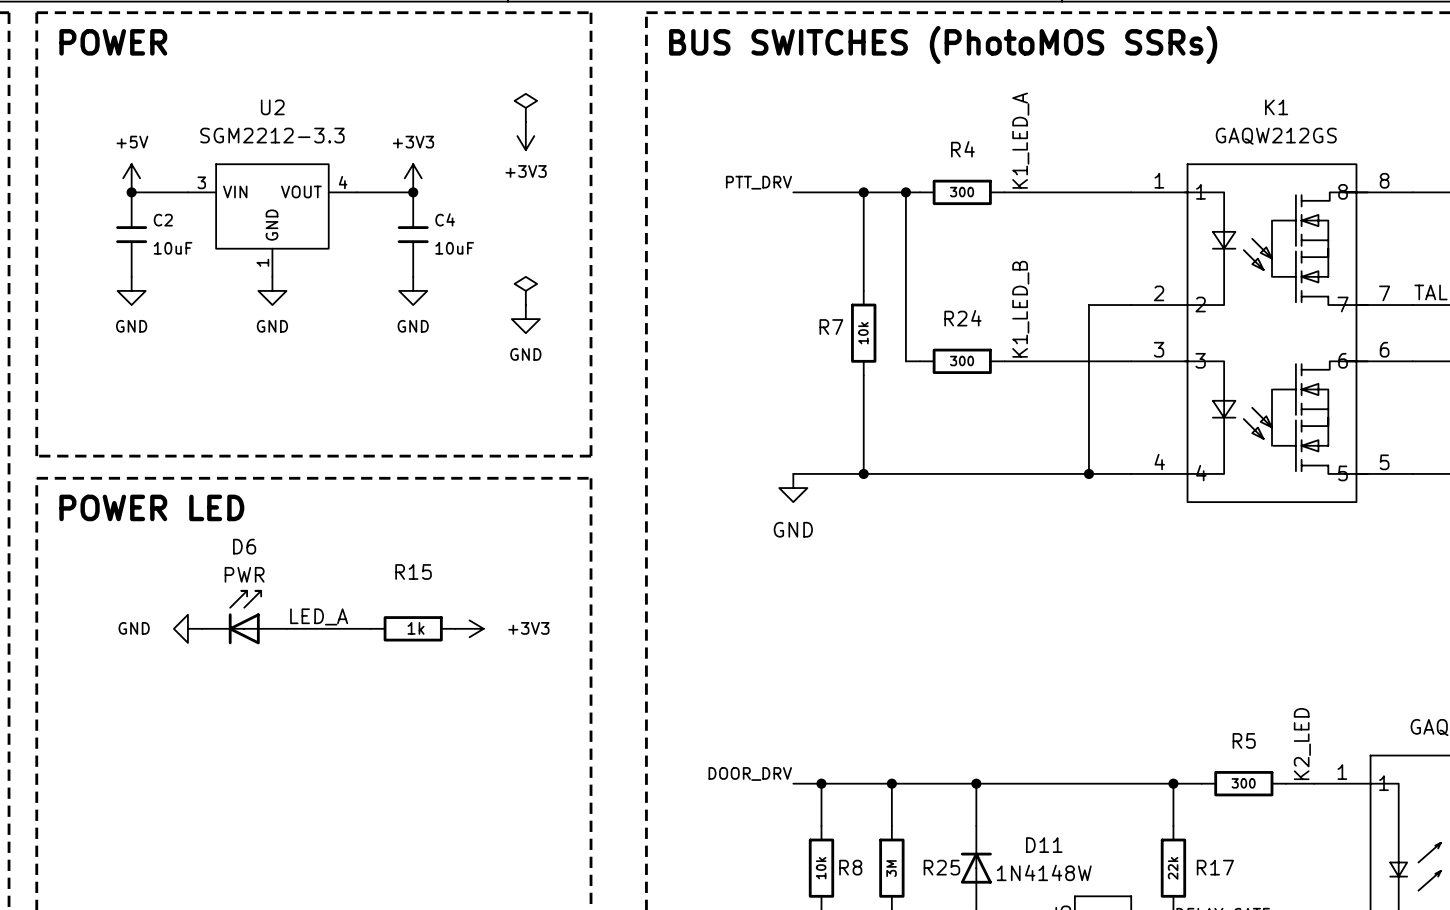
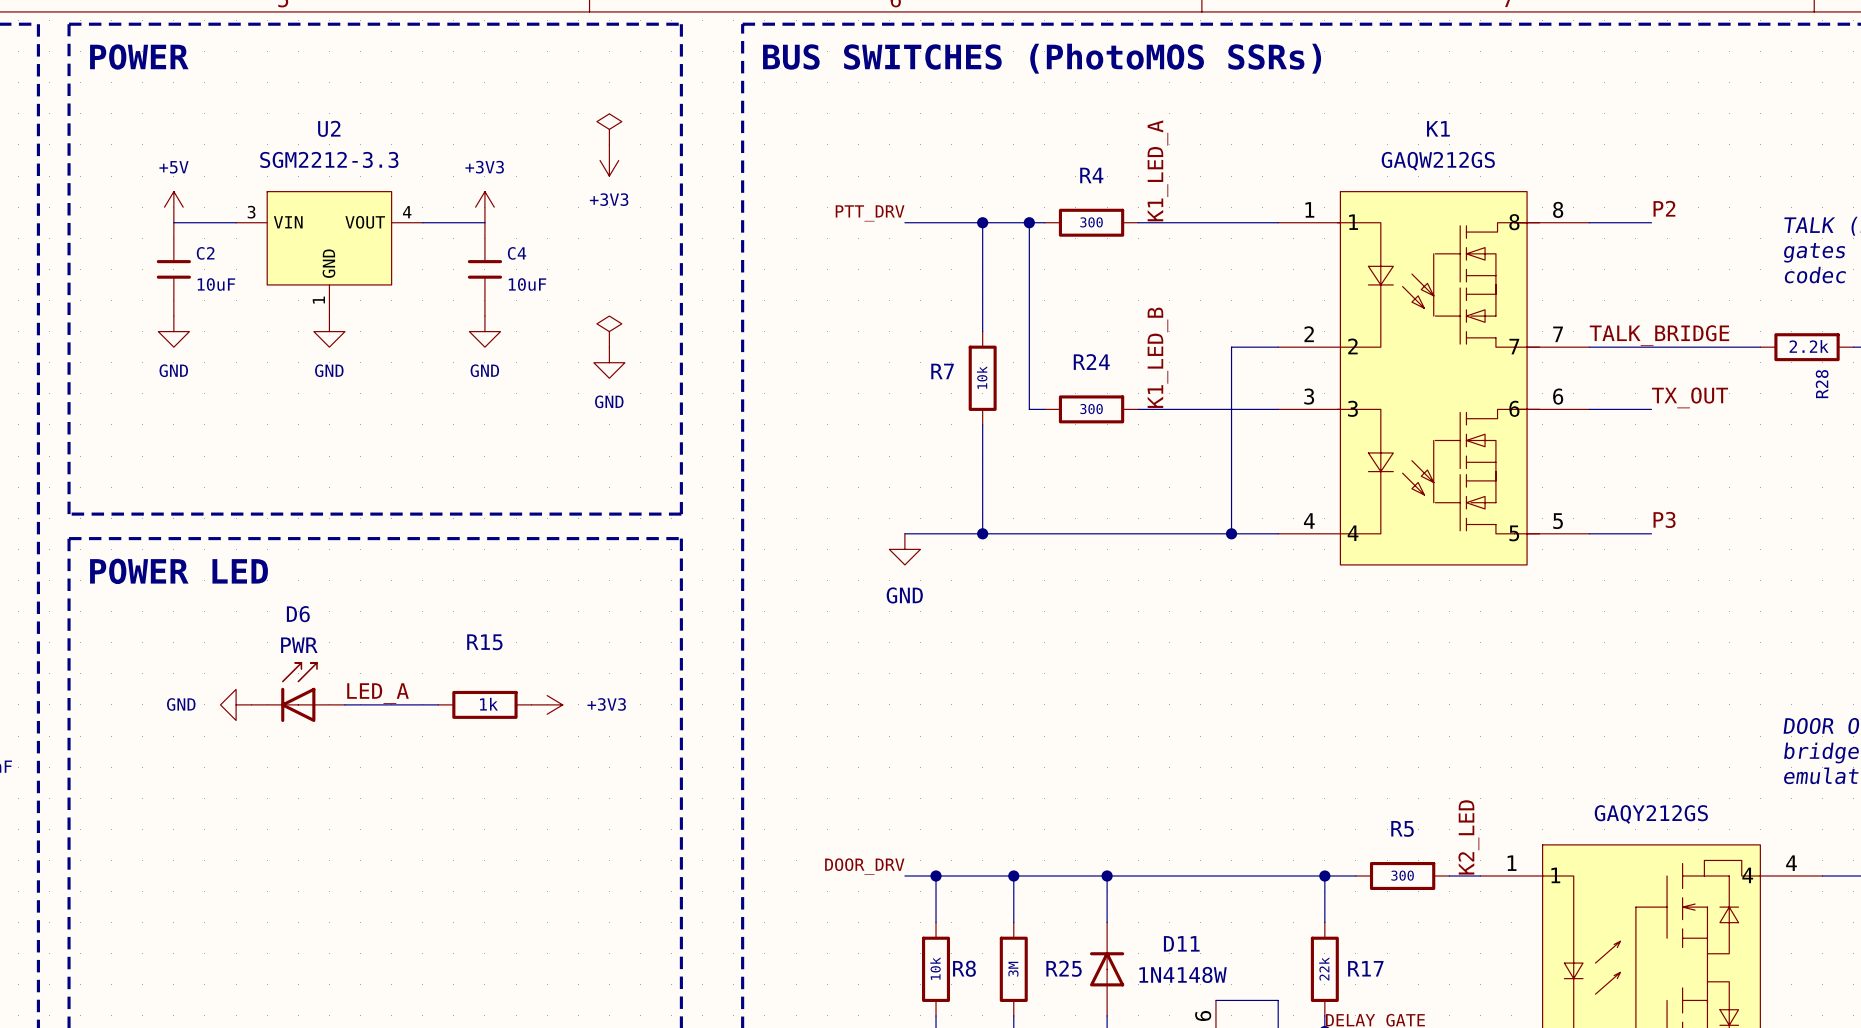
junction: (131, 192) -> none
junction: (413, 192) -> none

